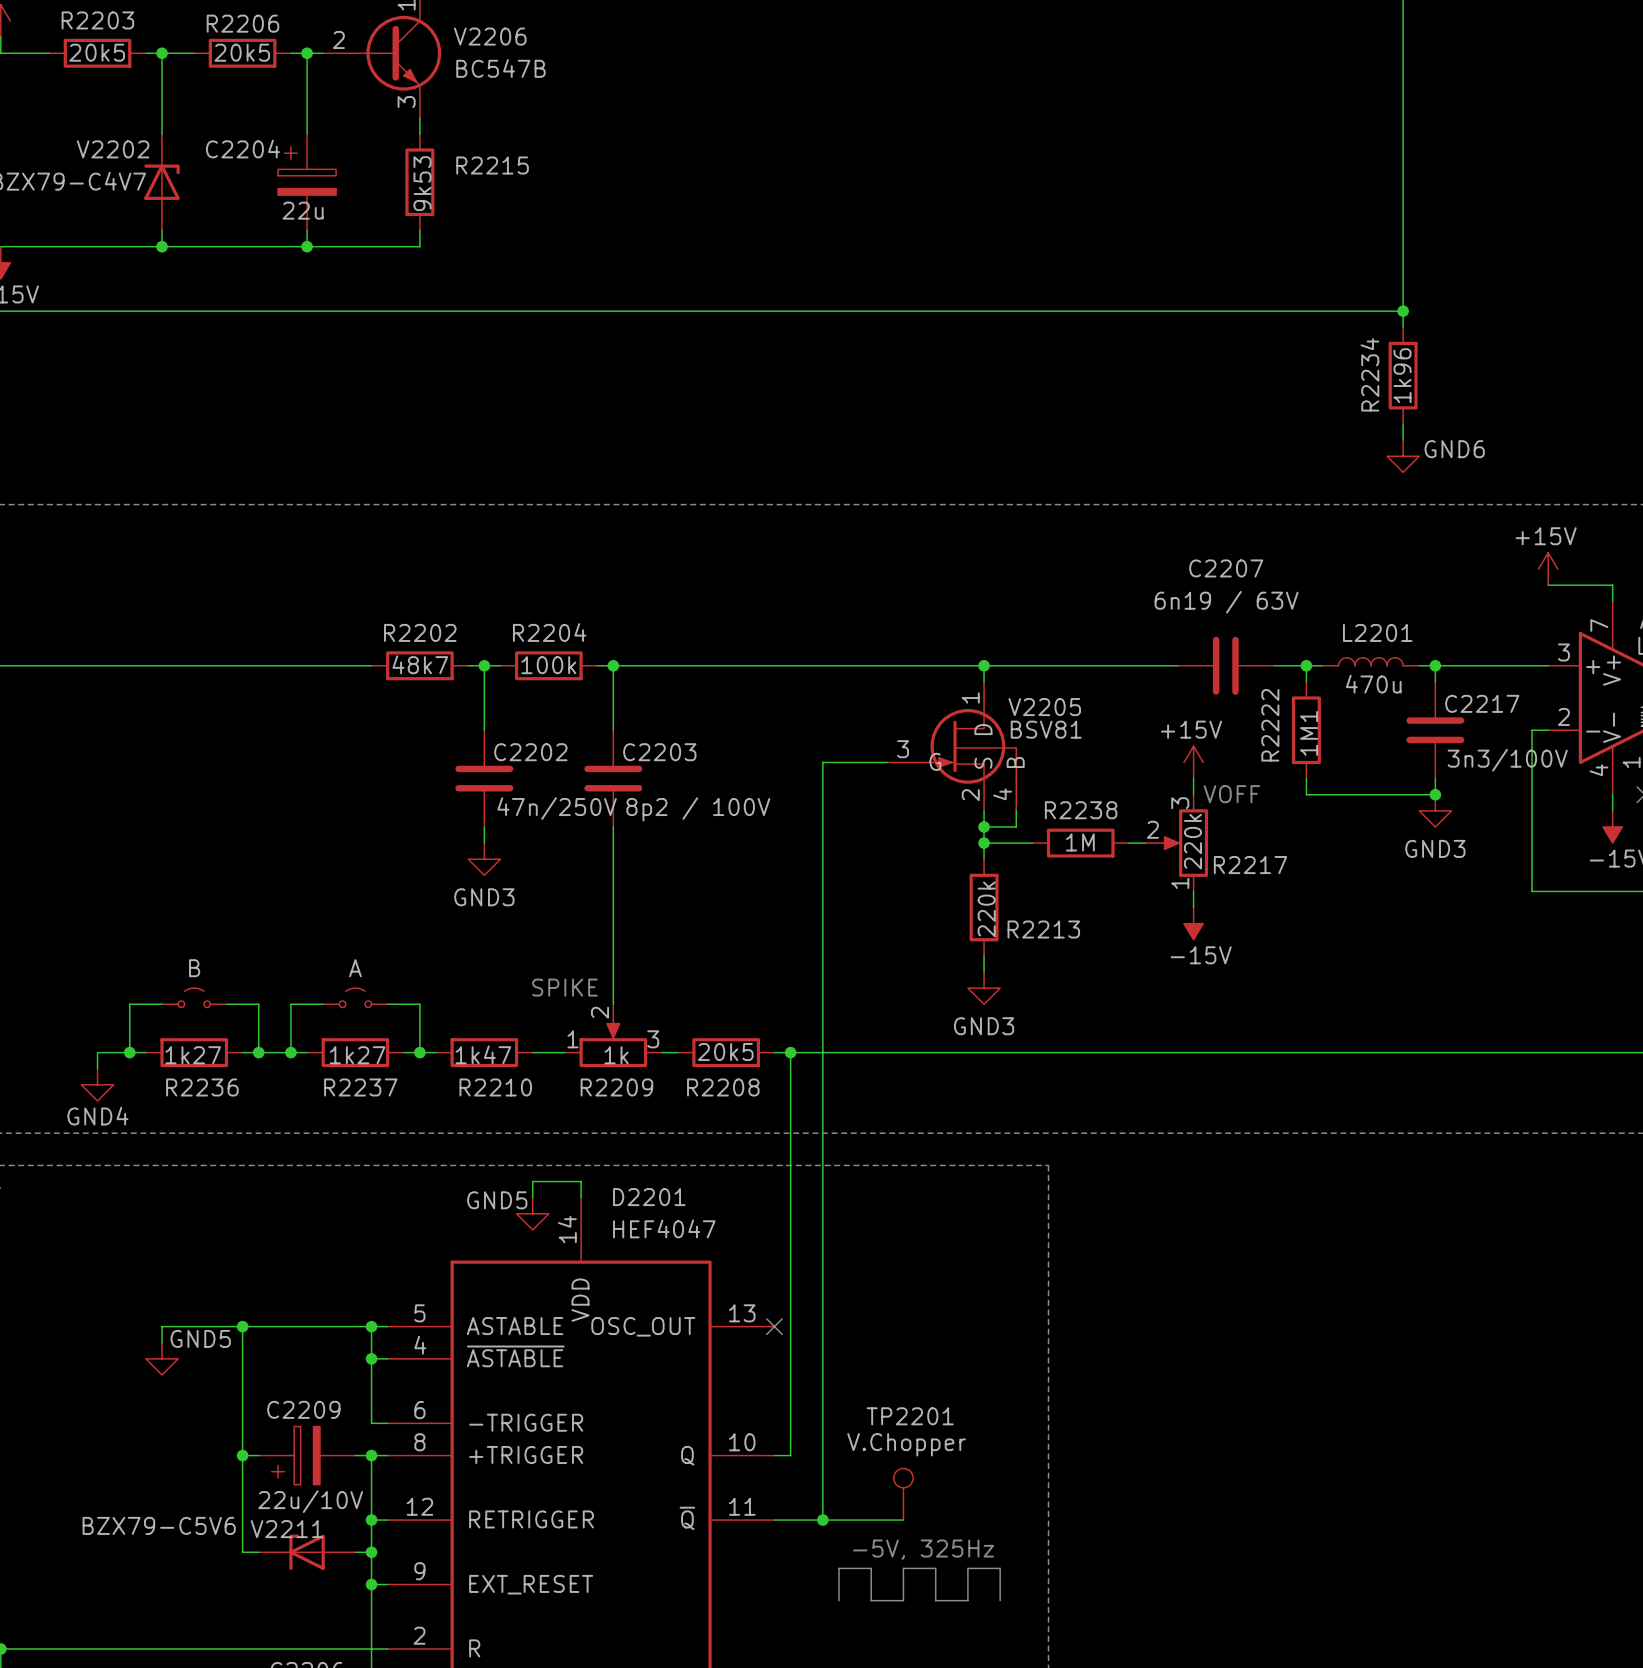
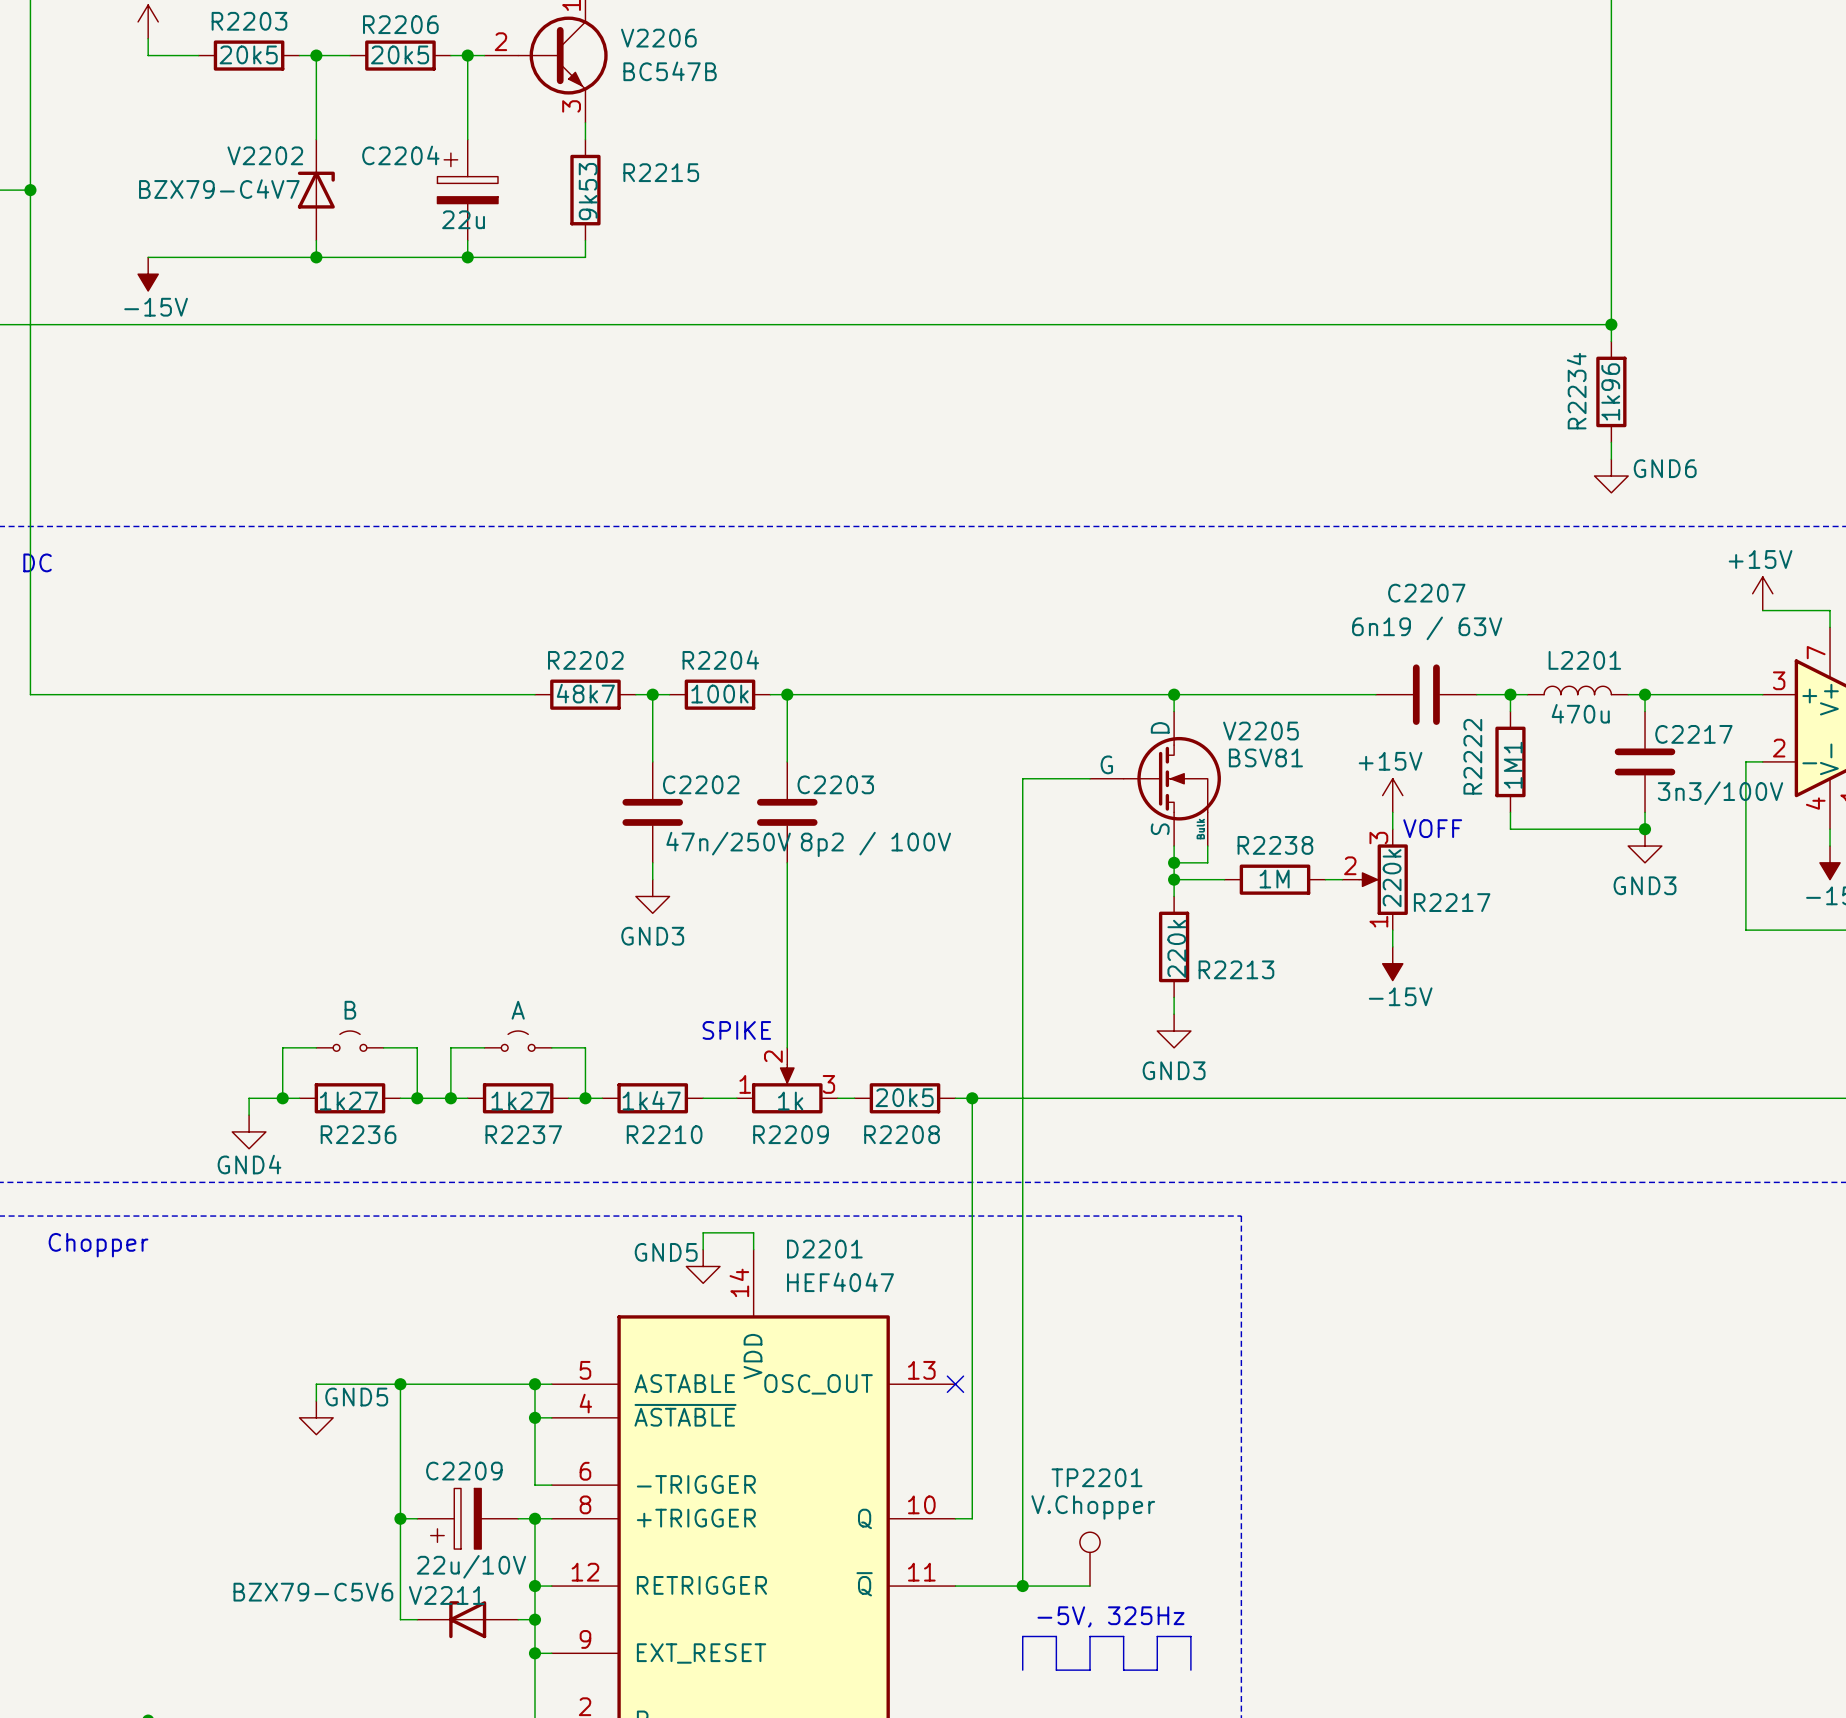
V2205 symbol: [887, 681, 1017, 811] -> [1090, 711, 1221, 847]
wire: none -> (1090, 778) (1022, 778) (1022, 1586)
wire: (887, 762) (822, 762) (822, 1520) -> none
junction position: (822, 1520) -> (1022, 1586)

